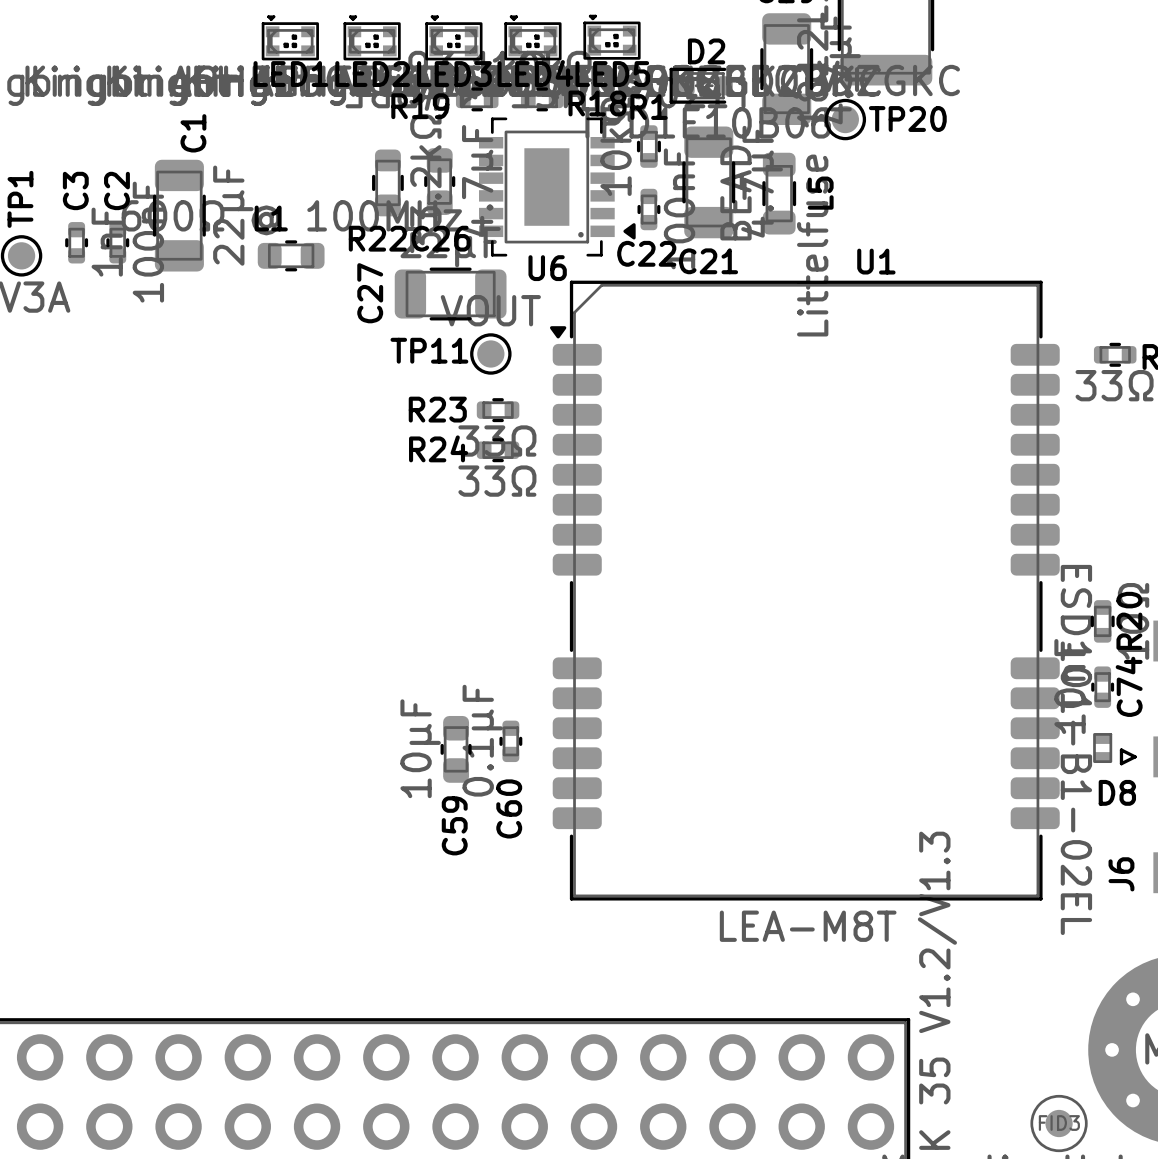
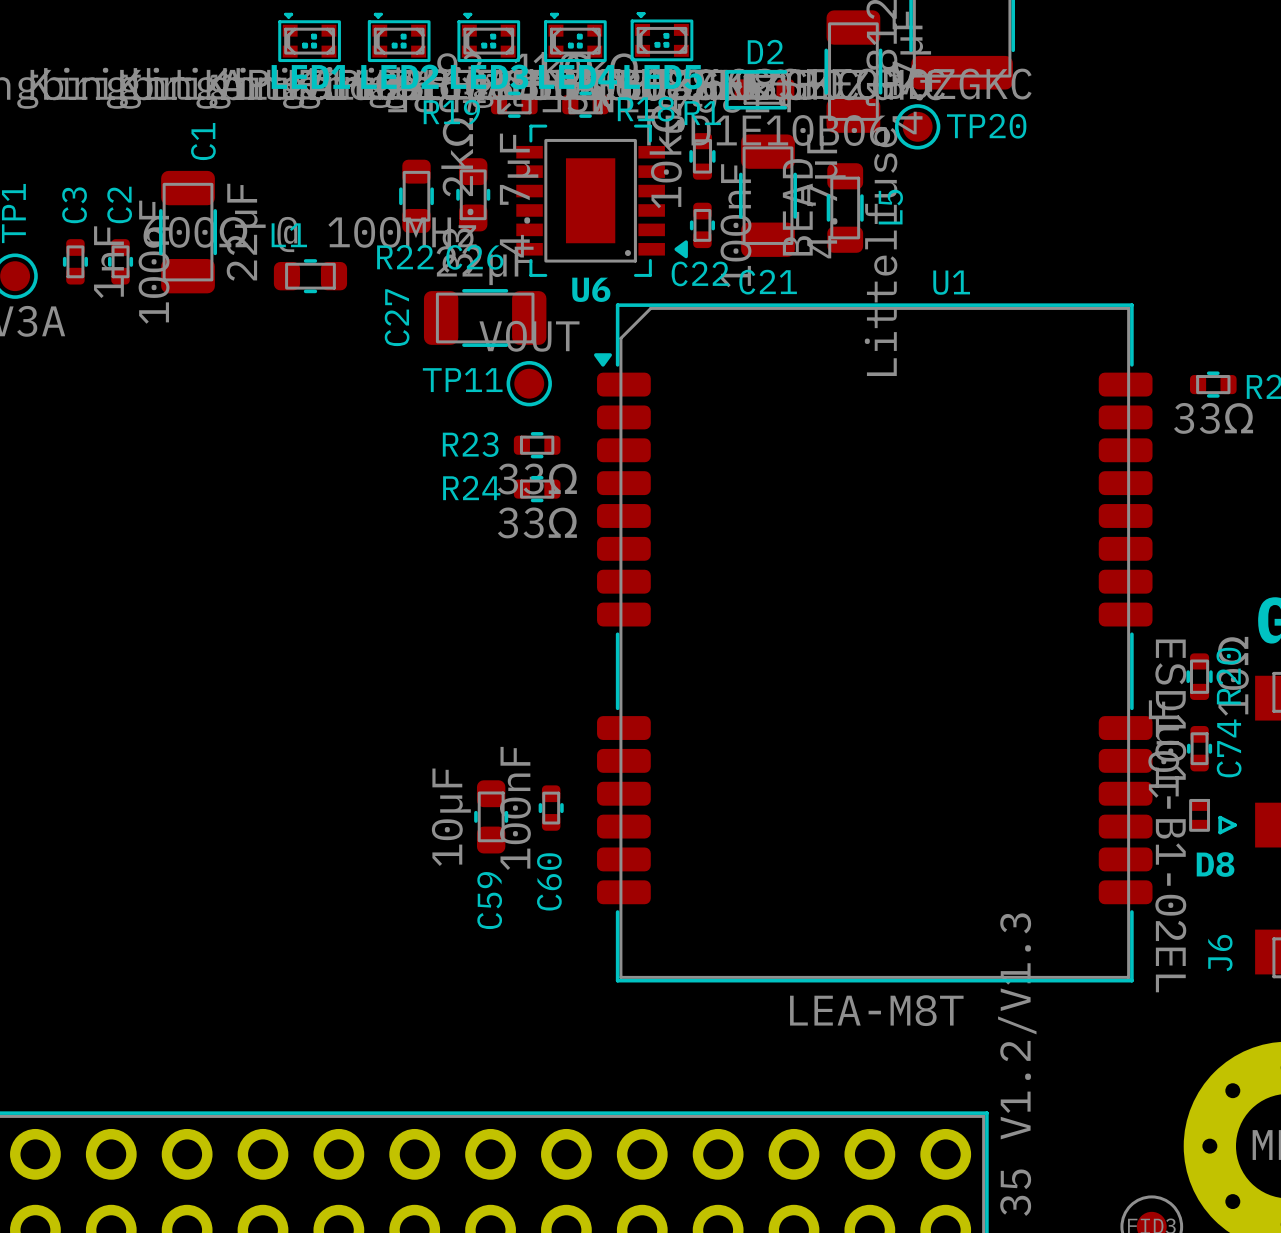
C60 value: 0.1µF (482, 740) -> 100nF (515, 808)

